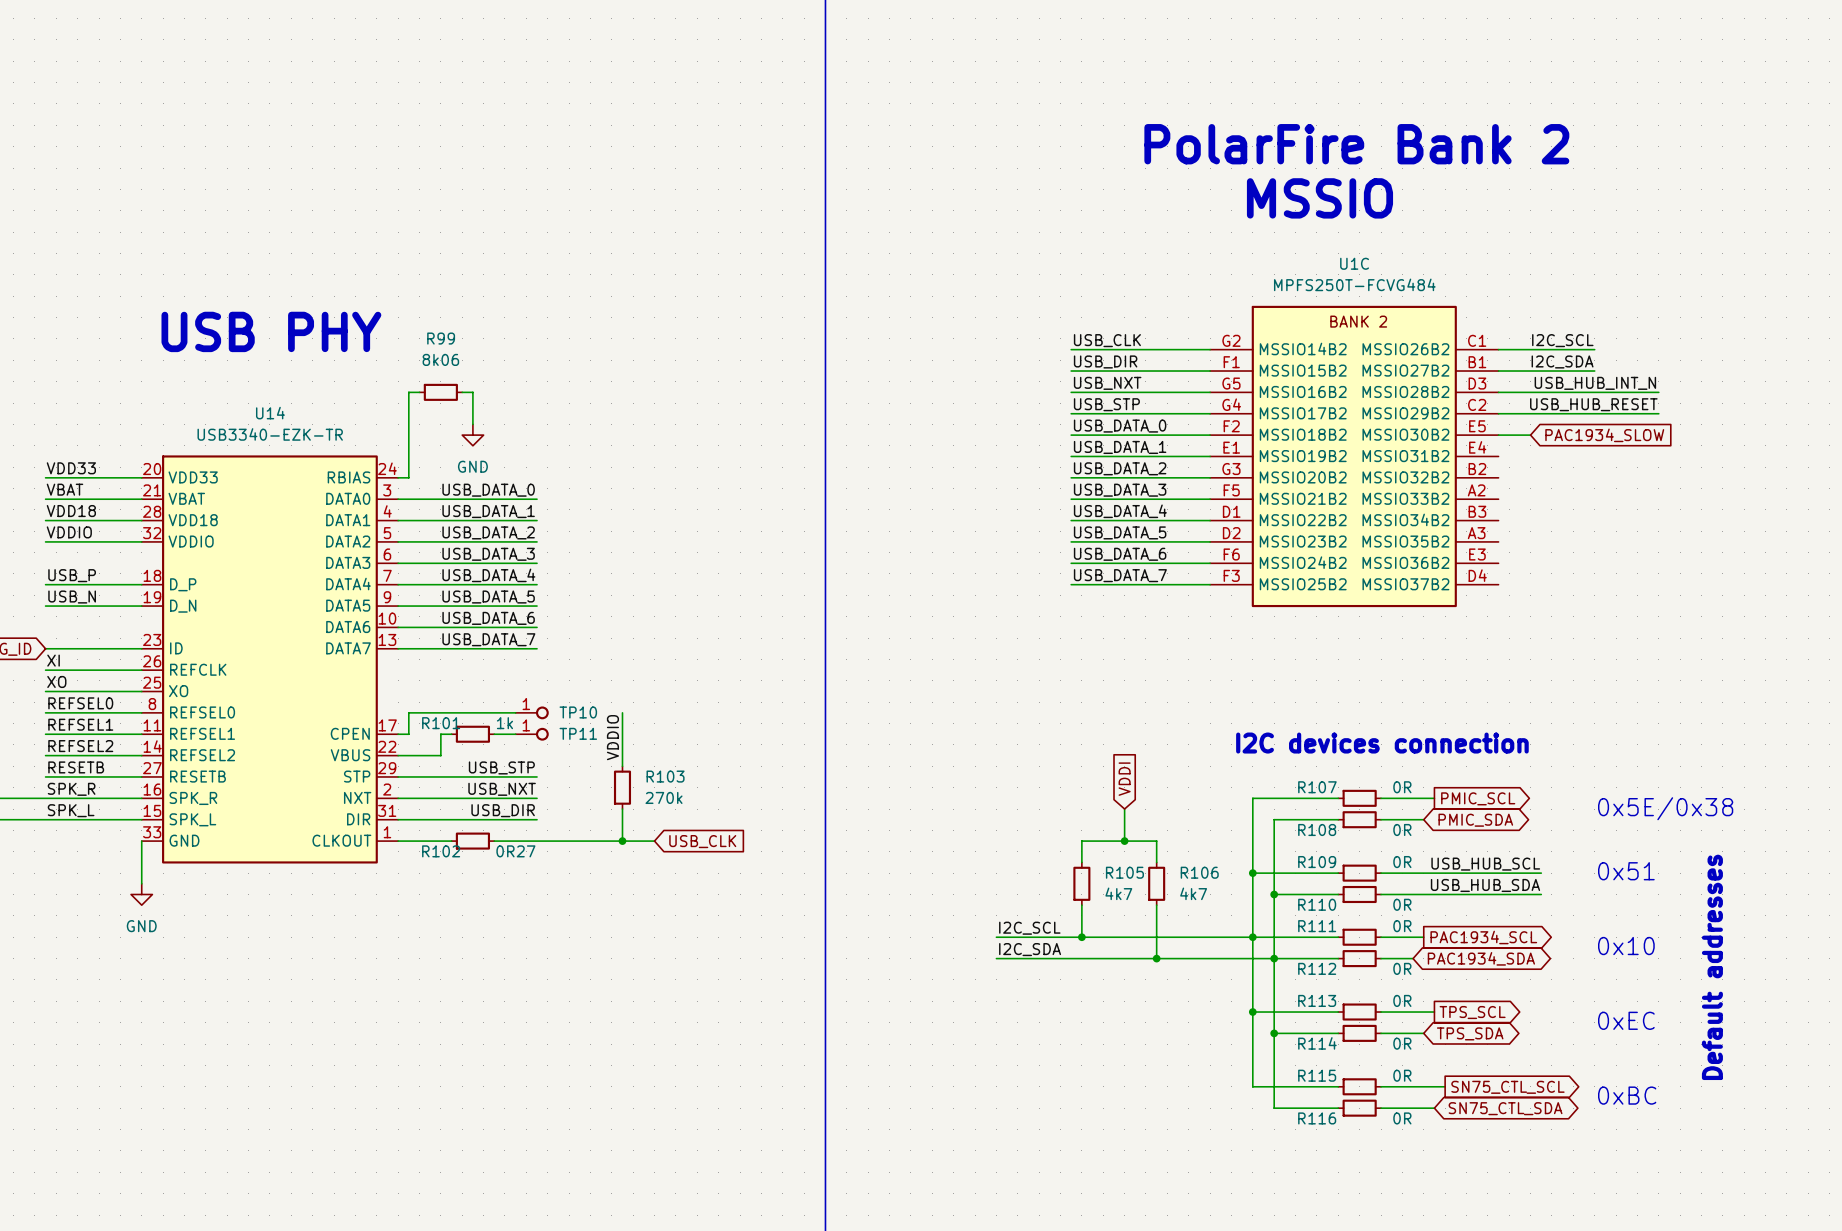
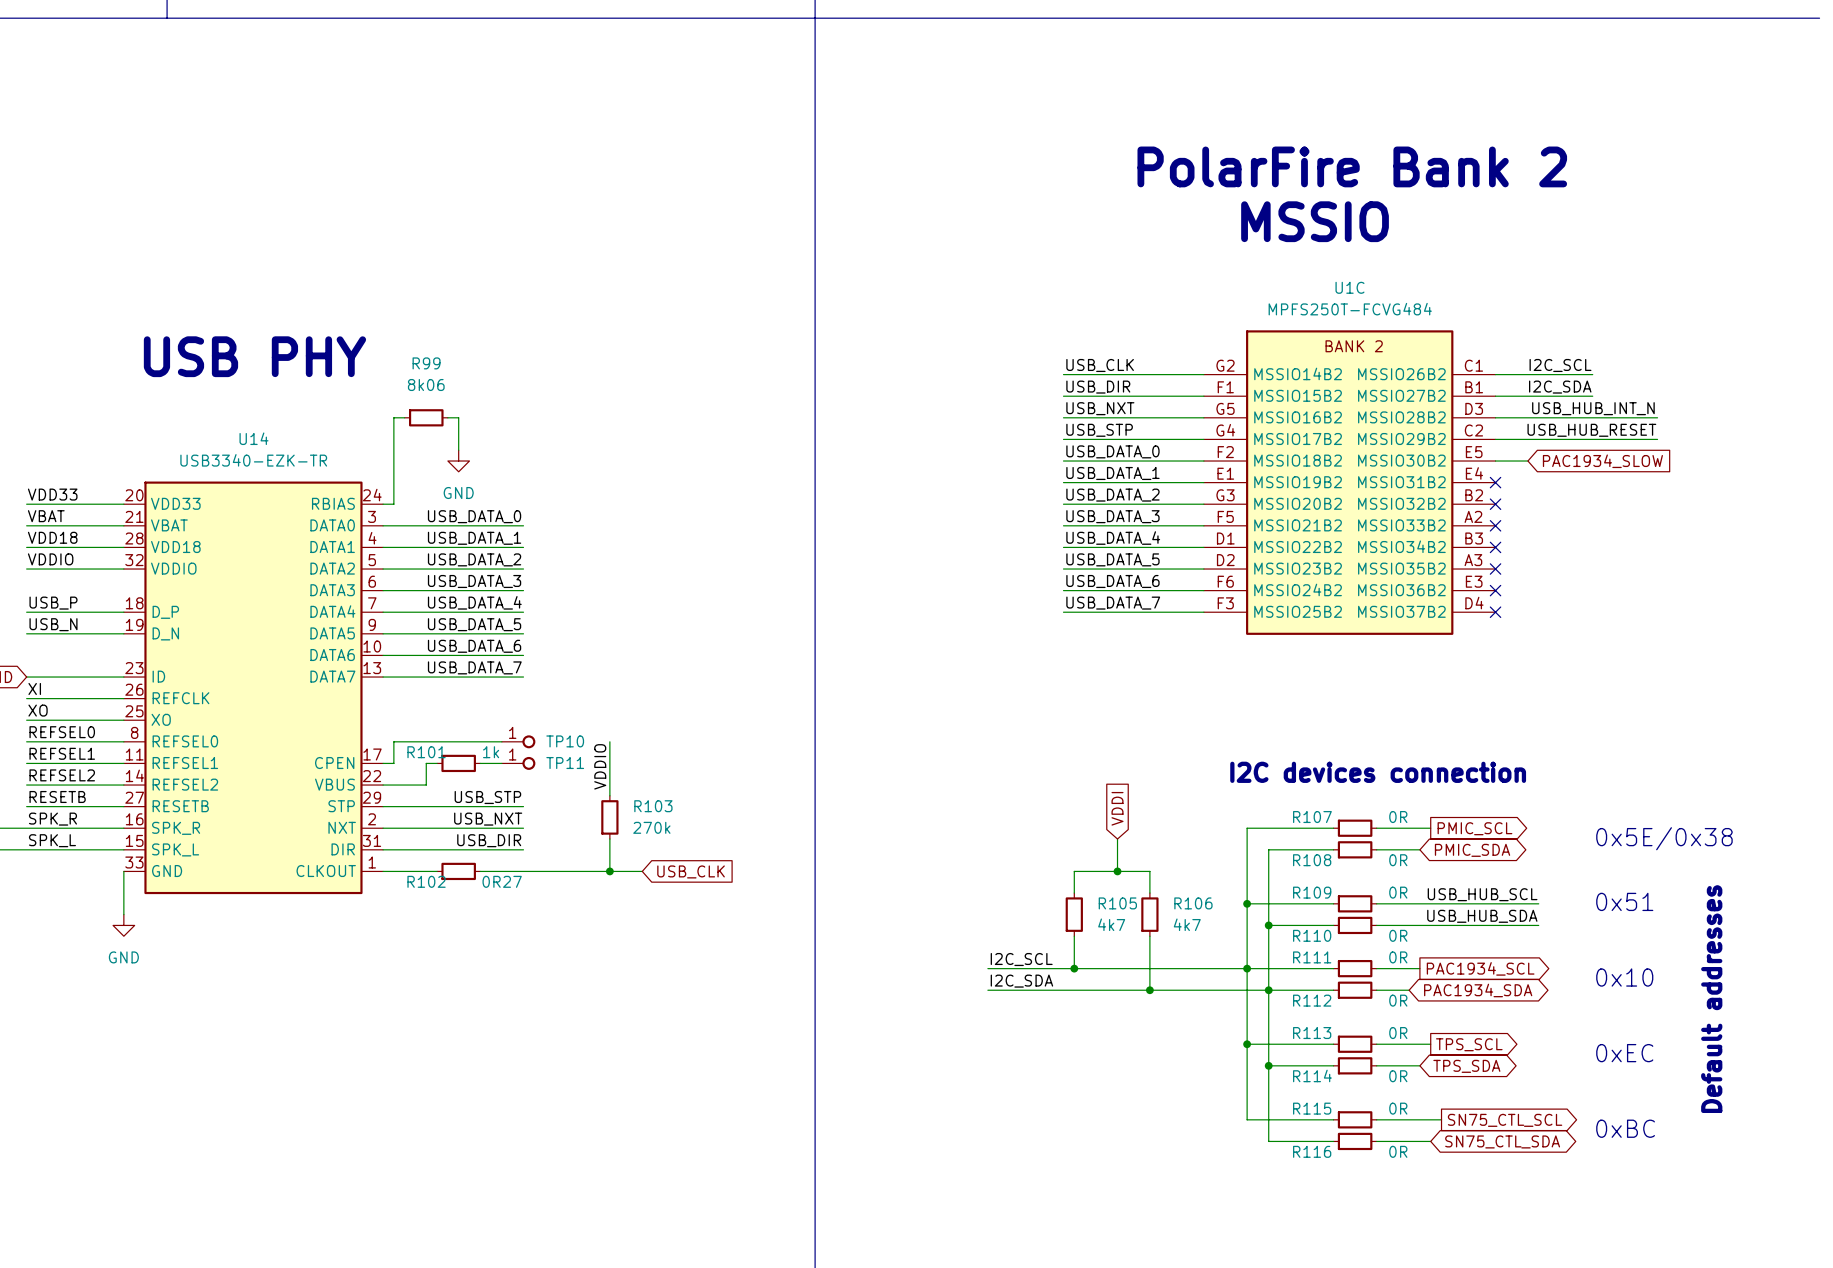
no-connect mark: none -> (1495, 482)
no-connect mark: none -> (1495, 504)
no-connect mark: none -> (1495, 525)
no-connect mark: none -> (1495, 547)
no-connect mark: none -> (1495, 569)
no-connect mark: none -> (1495, 590)
no-connect mark: none -> (1495, 612)

